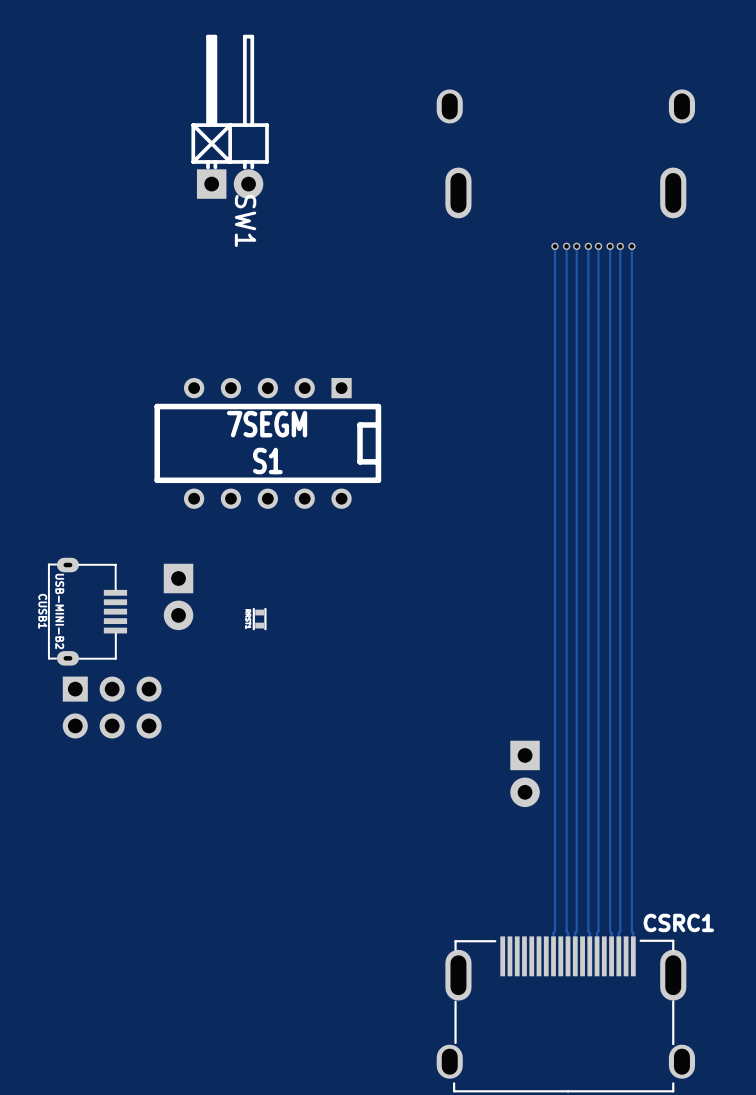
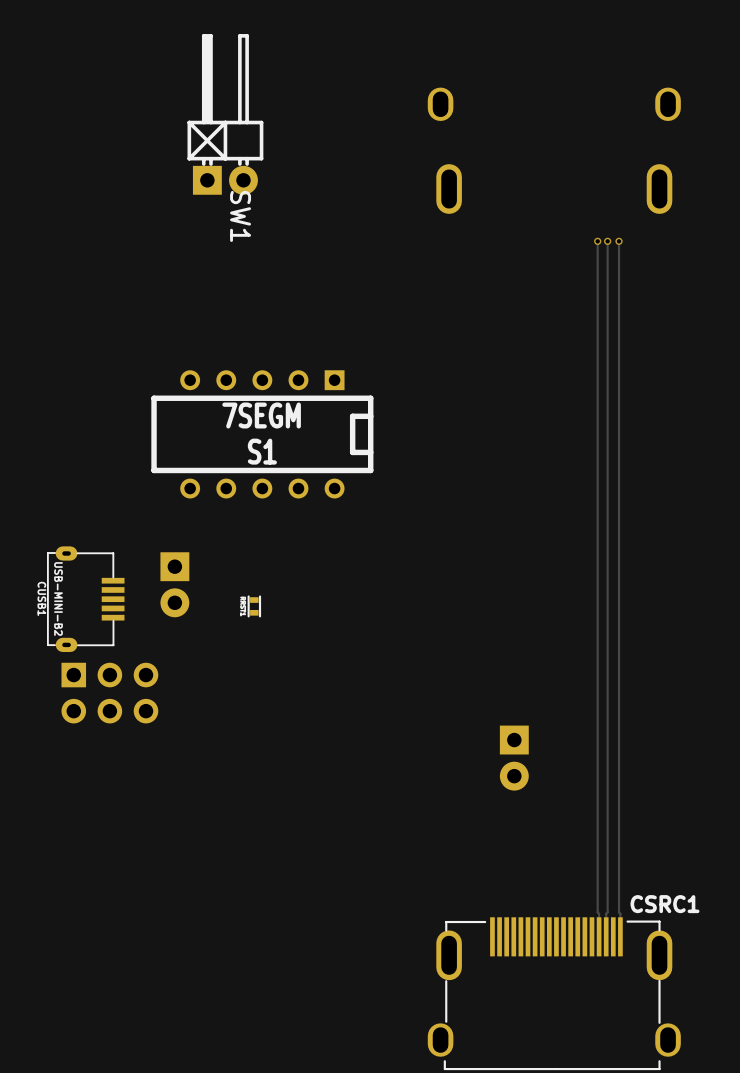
track: (554, 246) (553, 956) -> none
via: (554, 246) -> none
track: (566, 246) (568, 956) -> none
via: (566, 246) -> none
track: (576, 246) (575, 956) -> none
via: (576, 246) -> none
track: (588, 246) (589, 956) -> none
via: (588, 246) -> none
track: (598, 246) (597, 956) -> none
via: (598, 246) -> none

